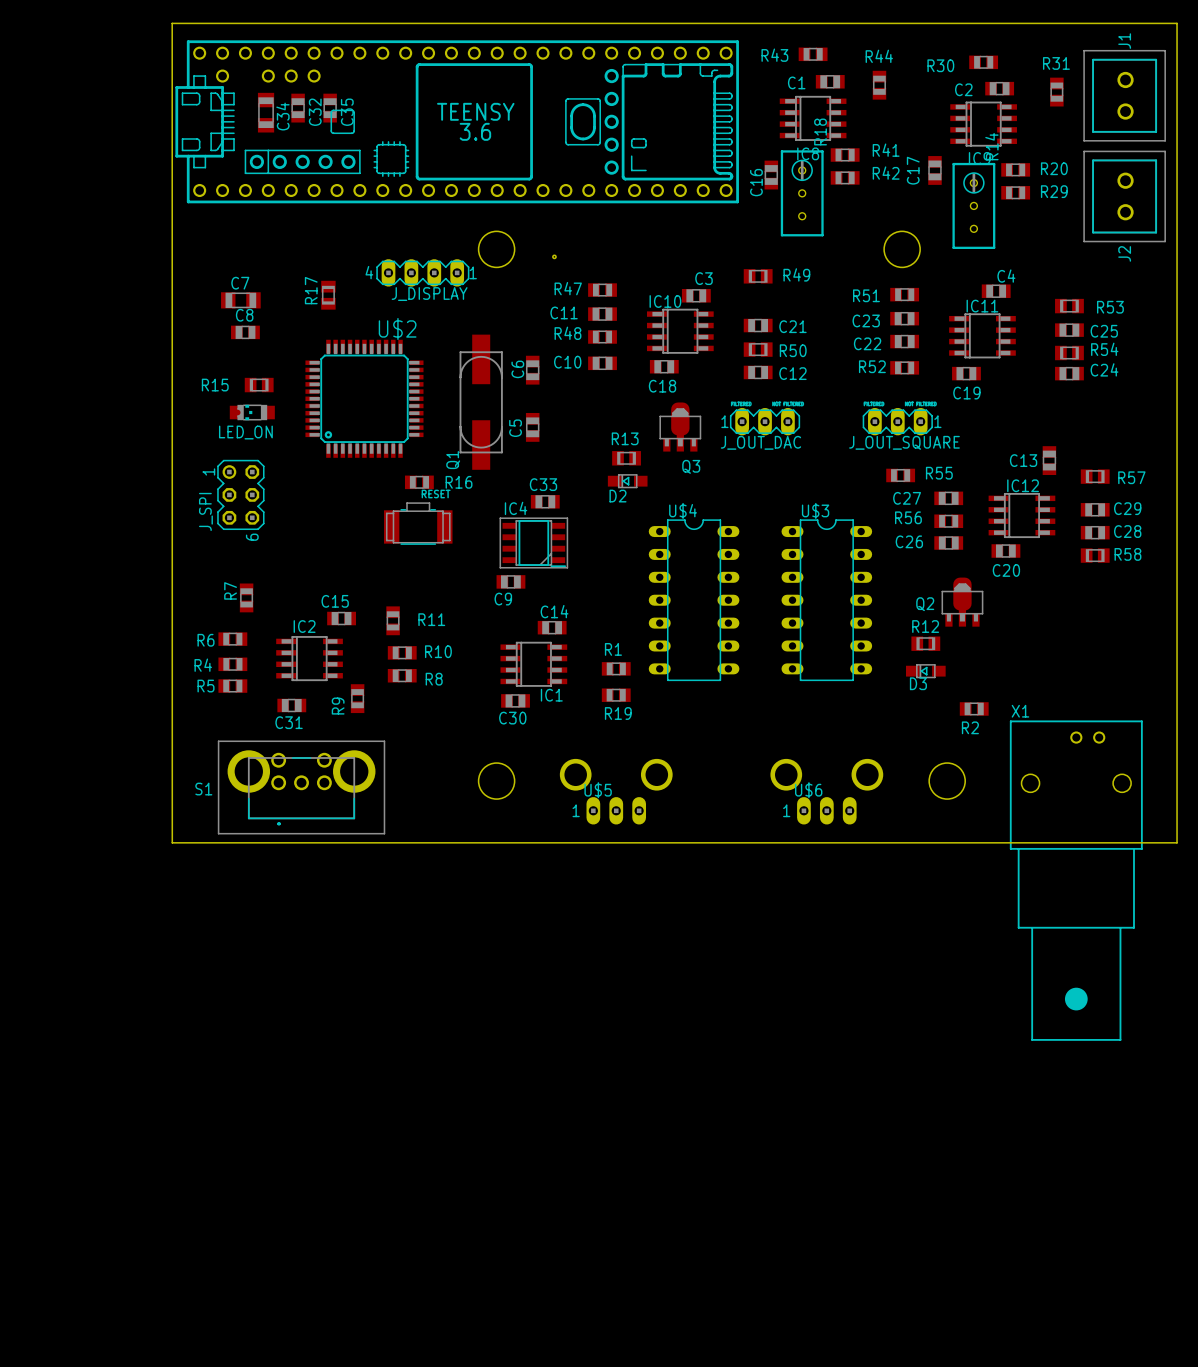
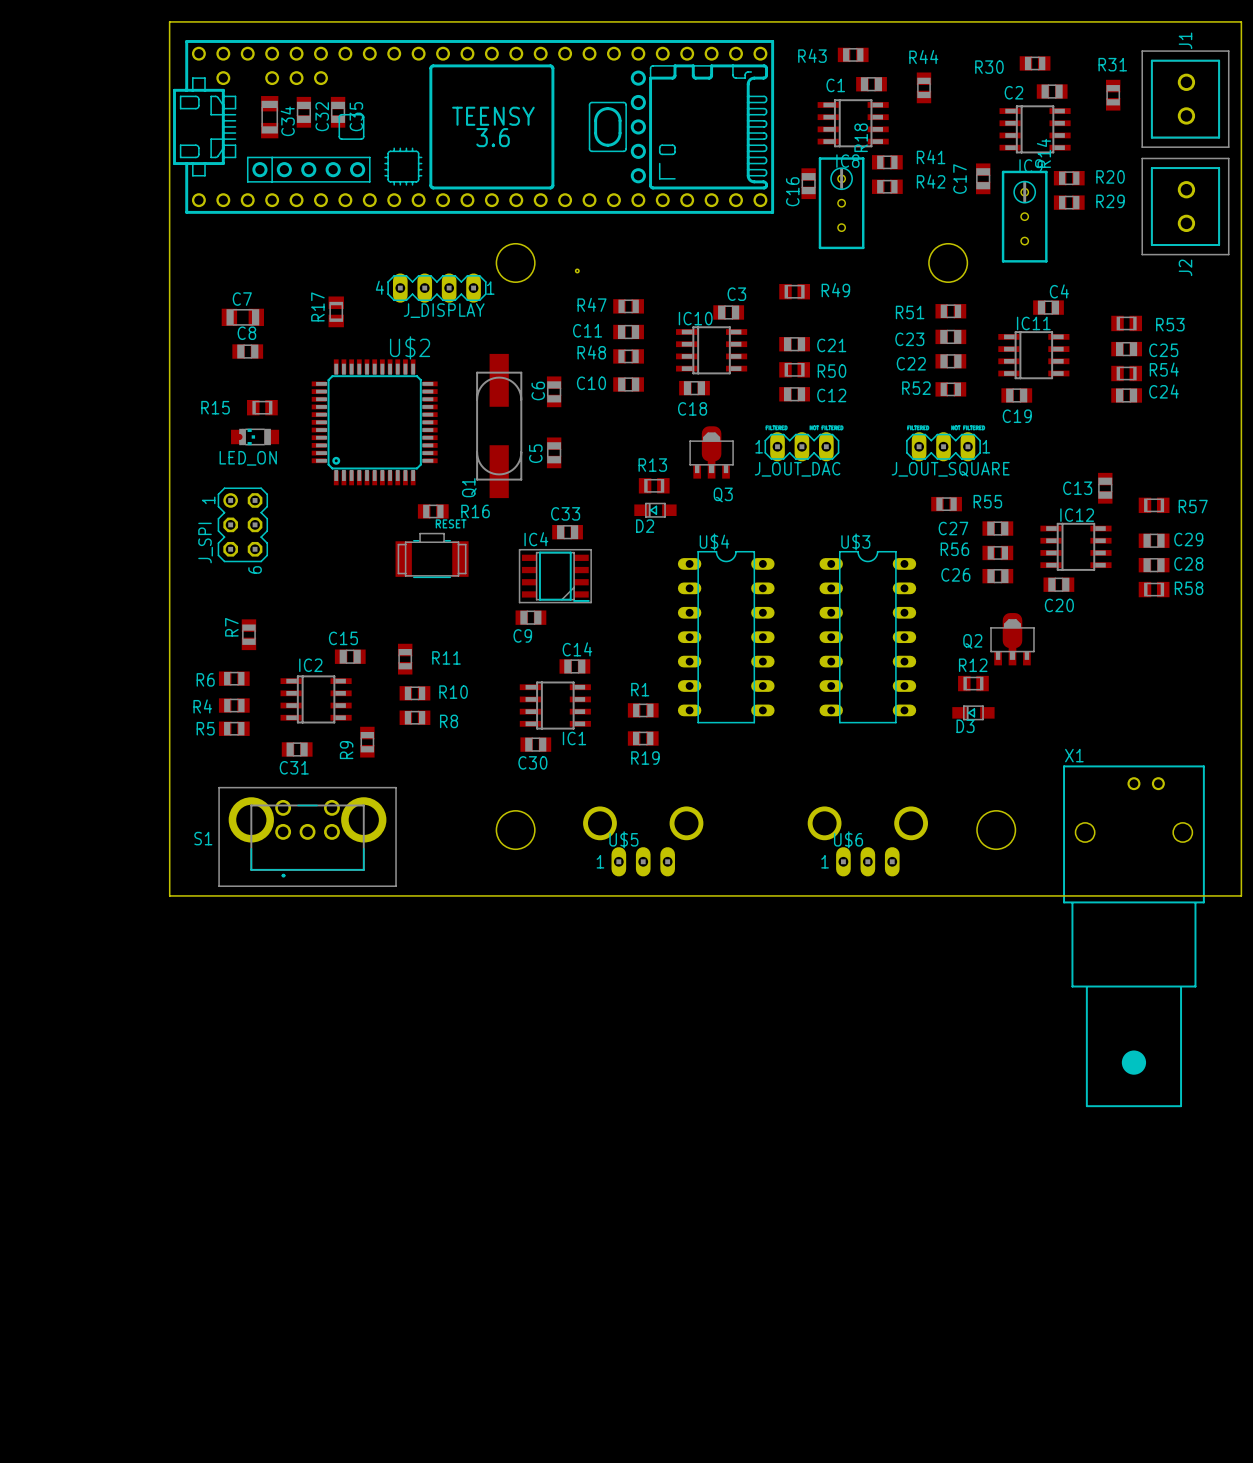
R2: (974, 708) -> none

